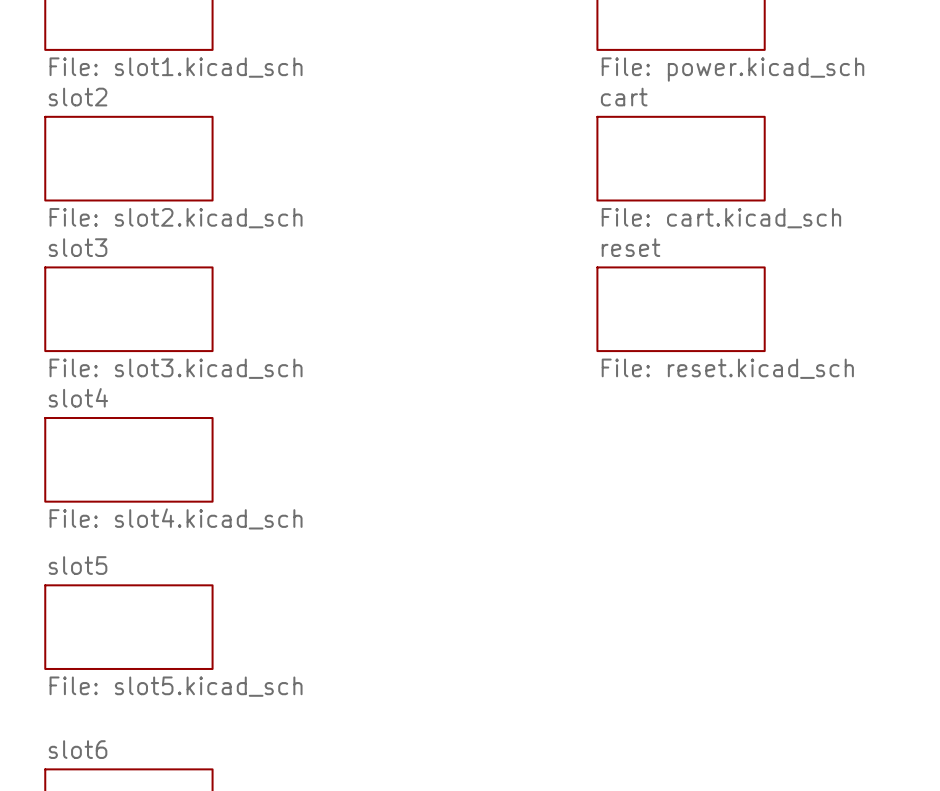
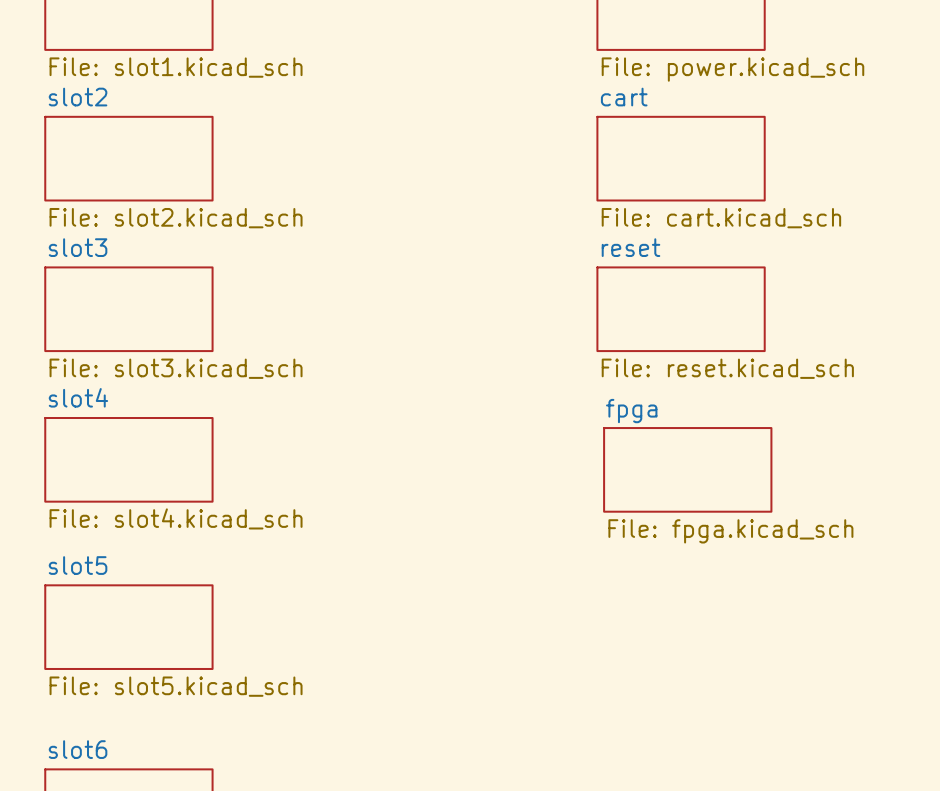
sheet fpga: none -> File: fpga.kicad_sch (687, 469)

